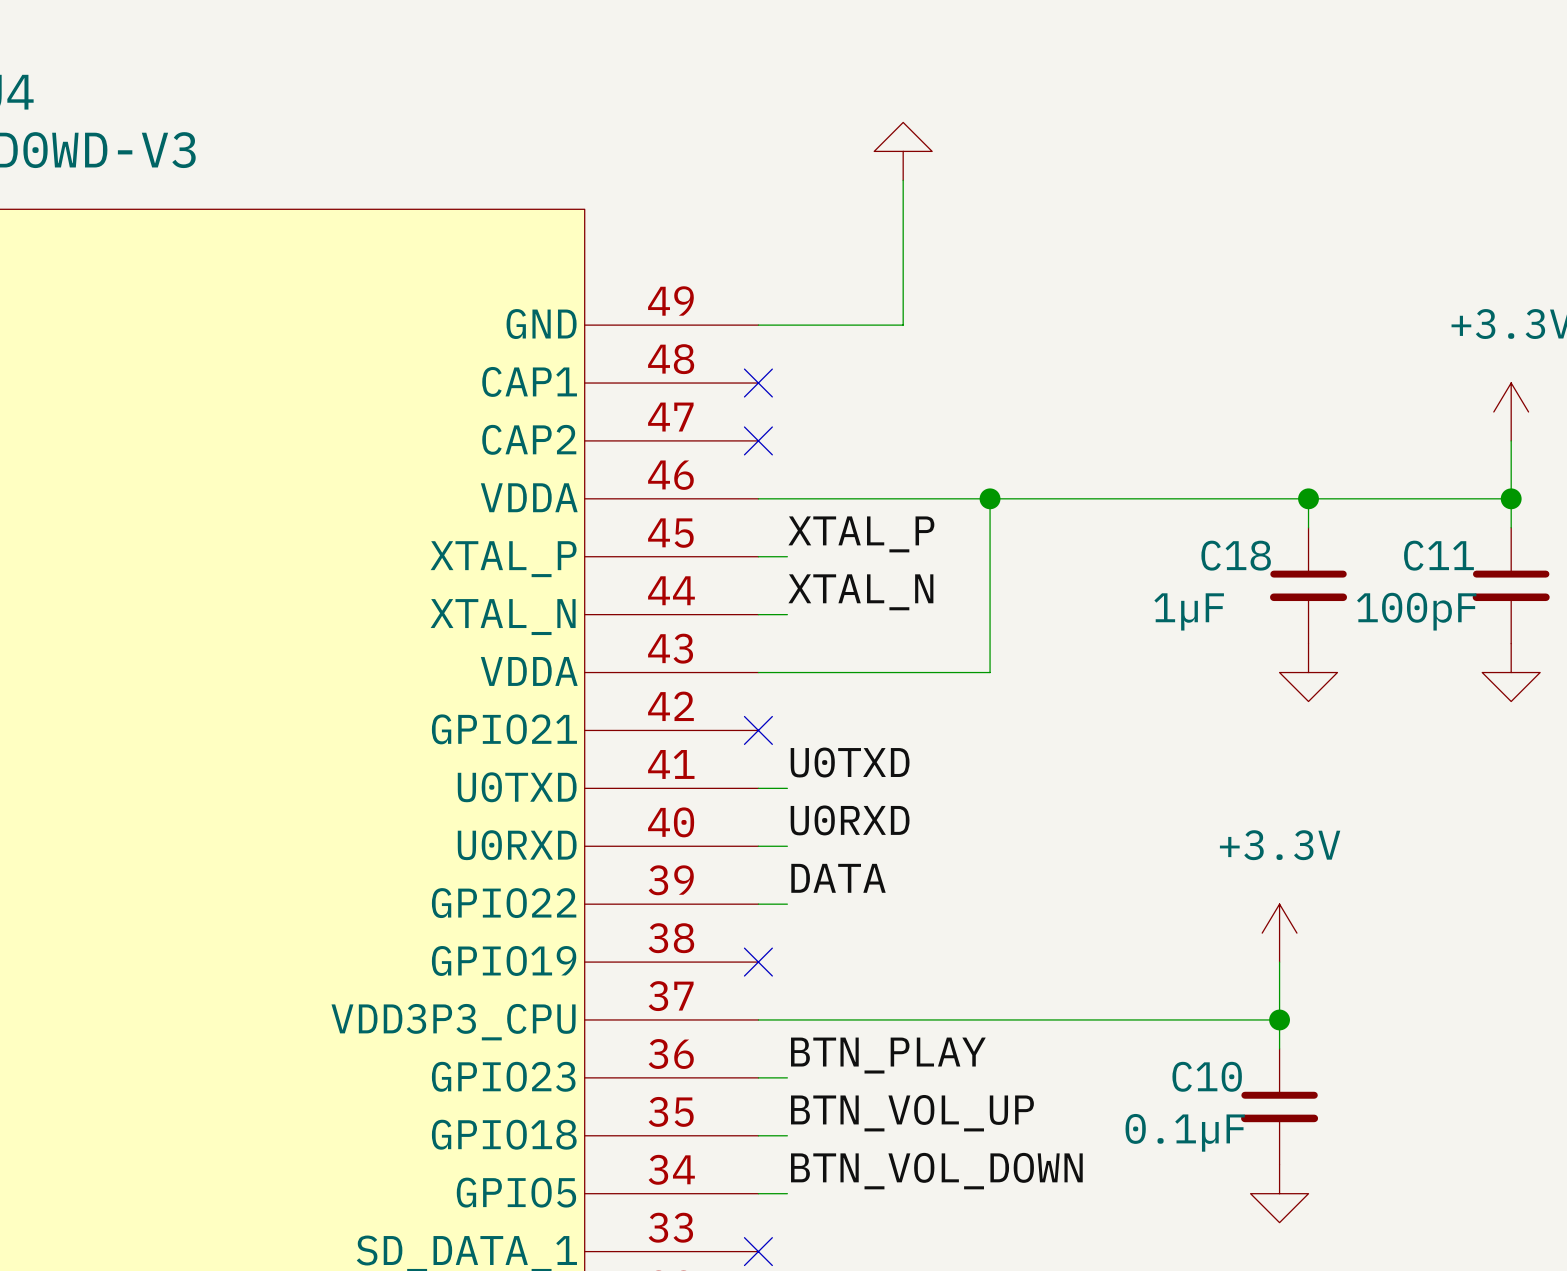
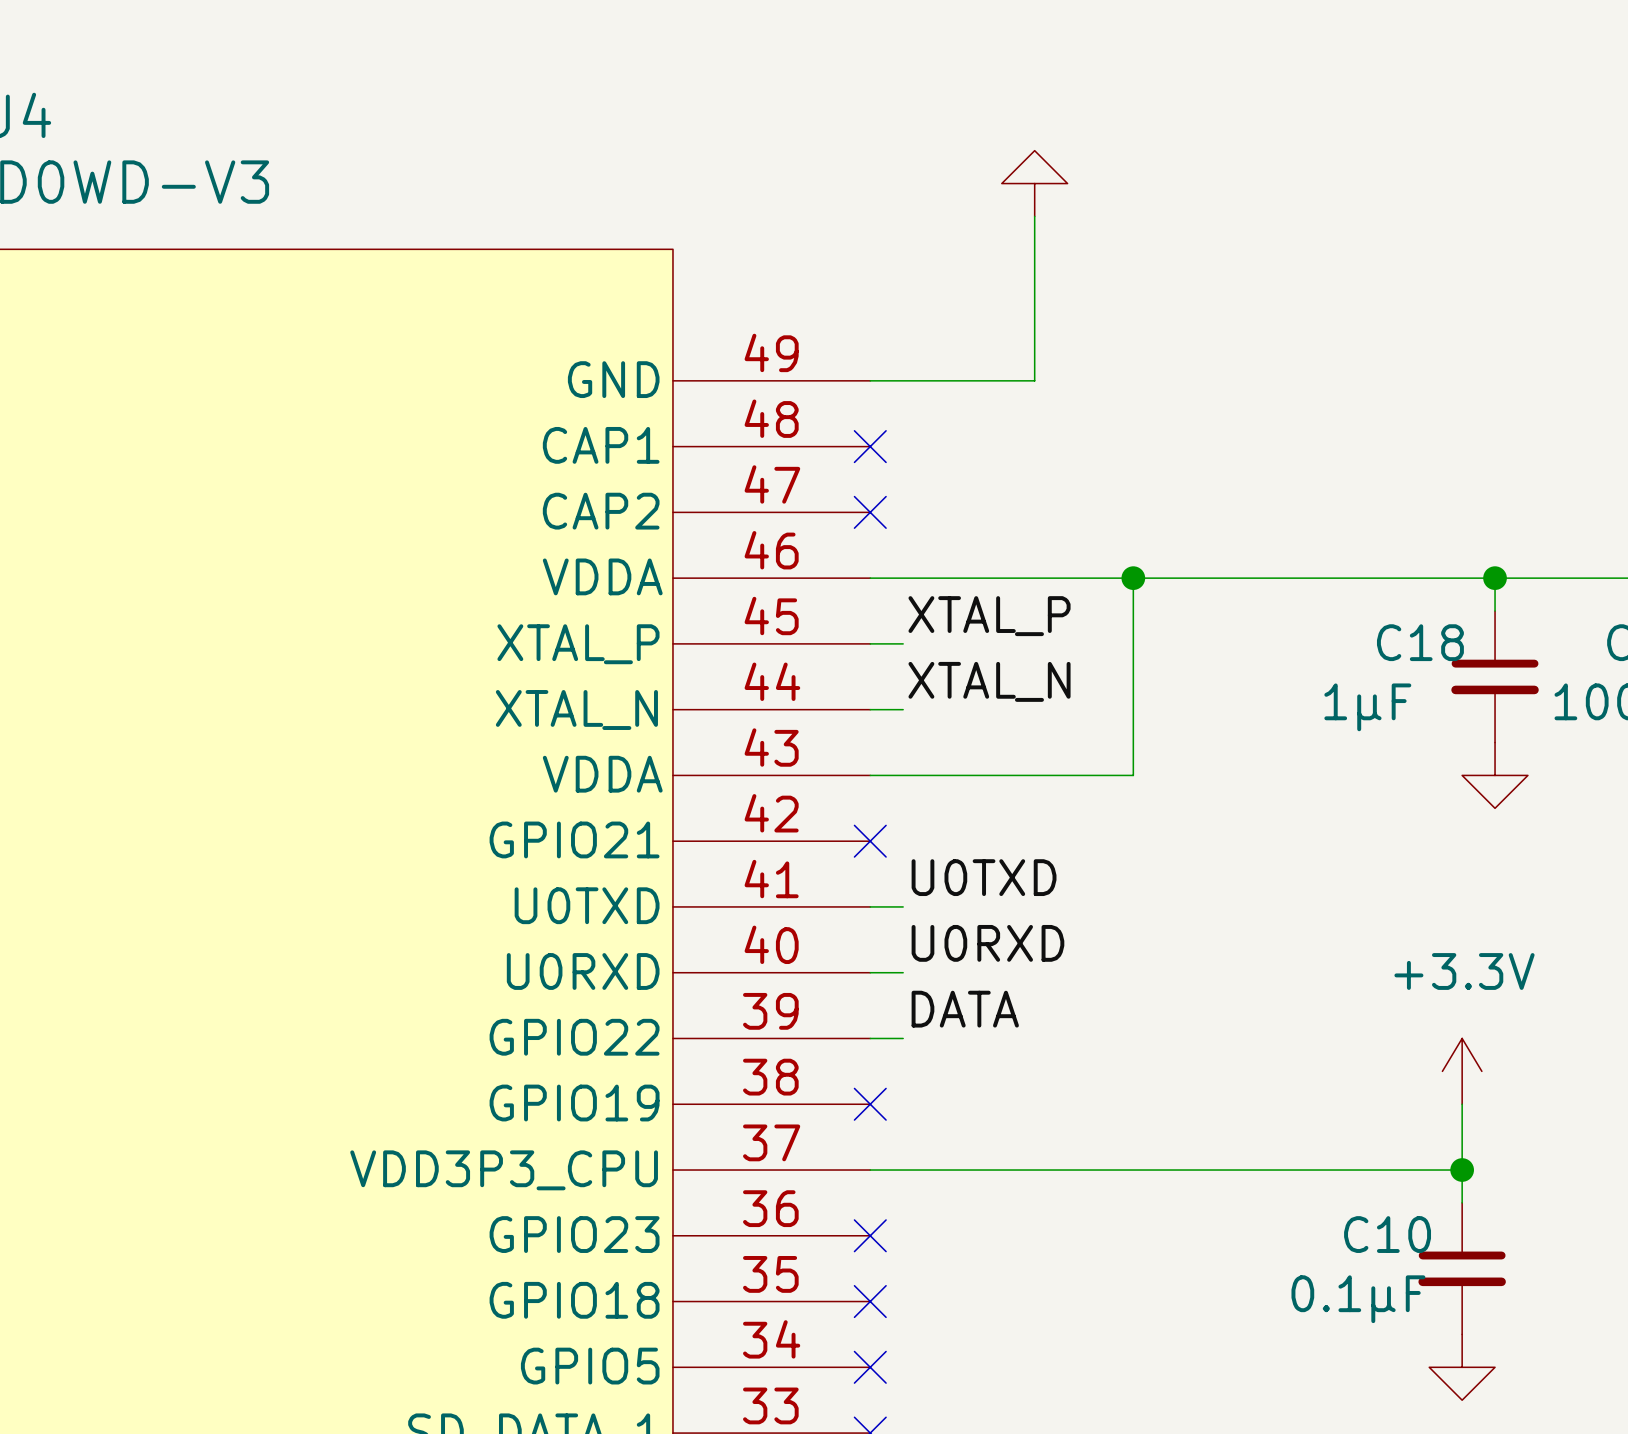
label: BTN_PLAY (888, 1055) -> none
wire: (758, 1077) (787, 1077) -> none
no-connect mark: none -> (870, 1235)
label: BTN_VOL_UP (912, 1113) -> none
wire: (758, 1135) (787, 1135) -> none
no-connect mark: none -> (870, 1301)
label: BTN_VOL_DOWN (936, 1171) -> none
wire: (758, 1193) (787, 1193) -> none
no-connect mark: none -> (870, 1367)

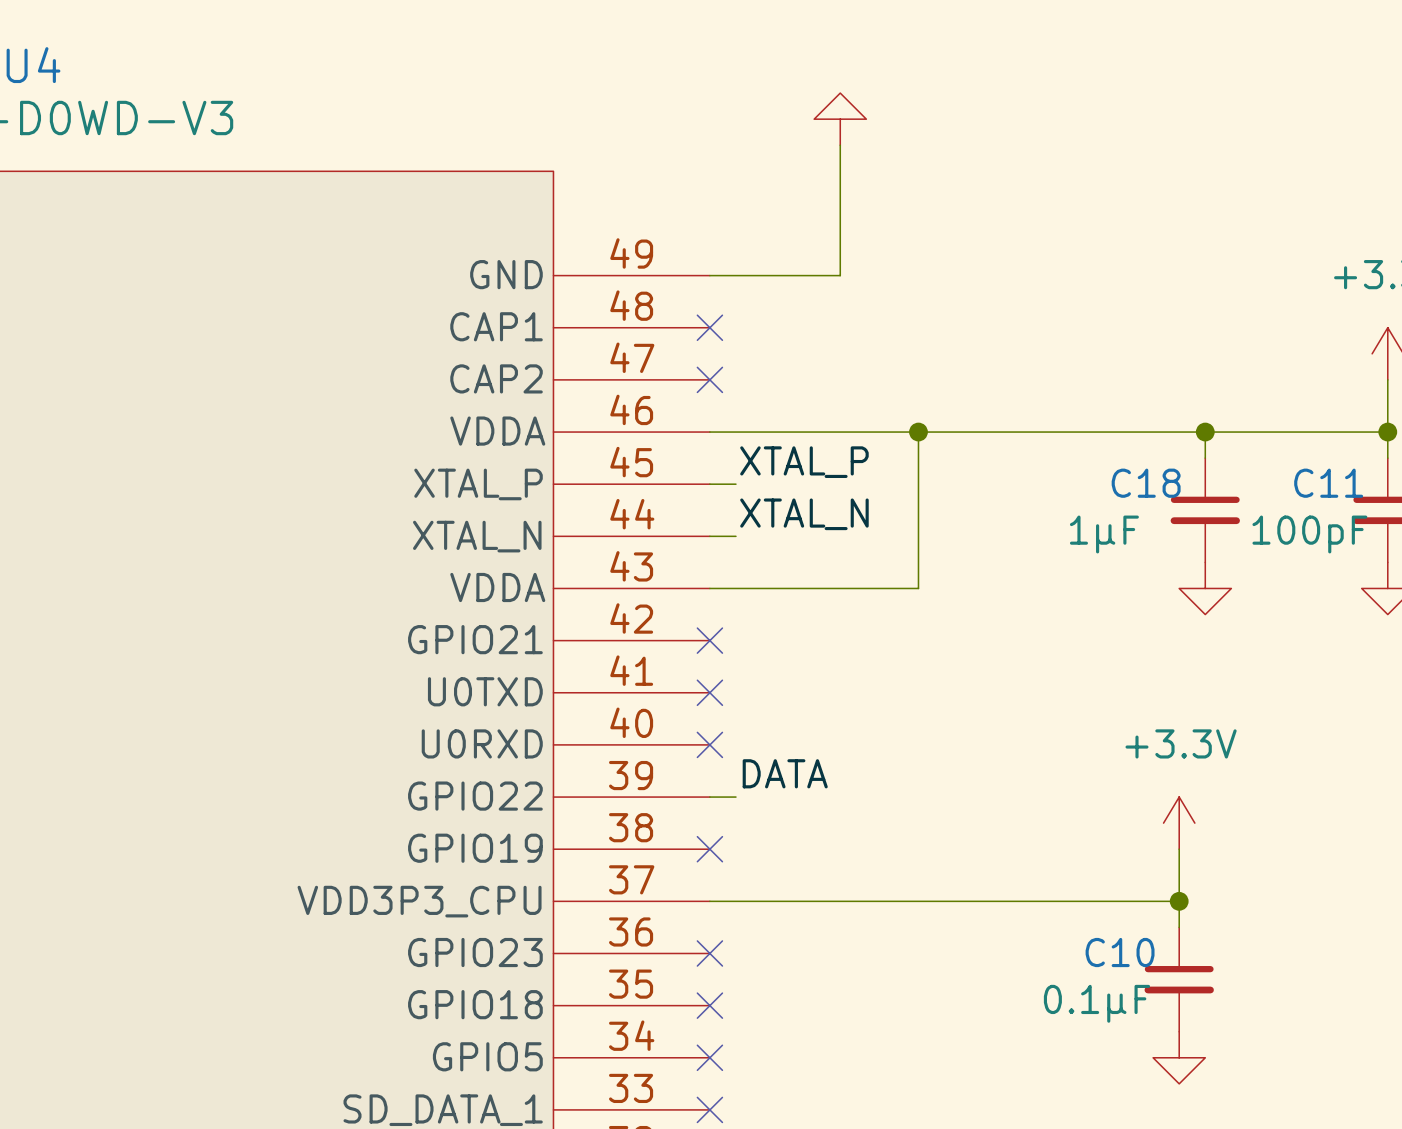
label: U0TXD (984, 877) -> none
wire: (870, 906) (903, 906) -> none
no-connect mark: none -> (709, 692)
label: U0RXD (987, 943) -> none
wire: (870, 972) (903, 972) -> none
no-connect mark: none -> (709, 744)

